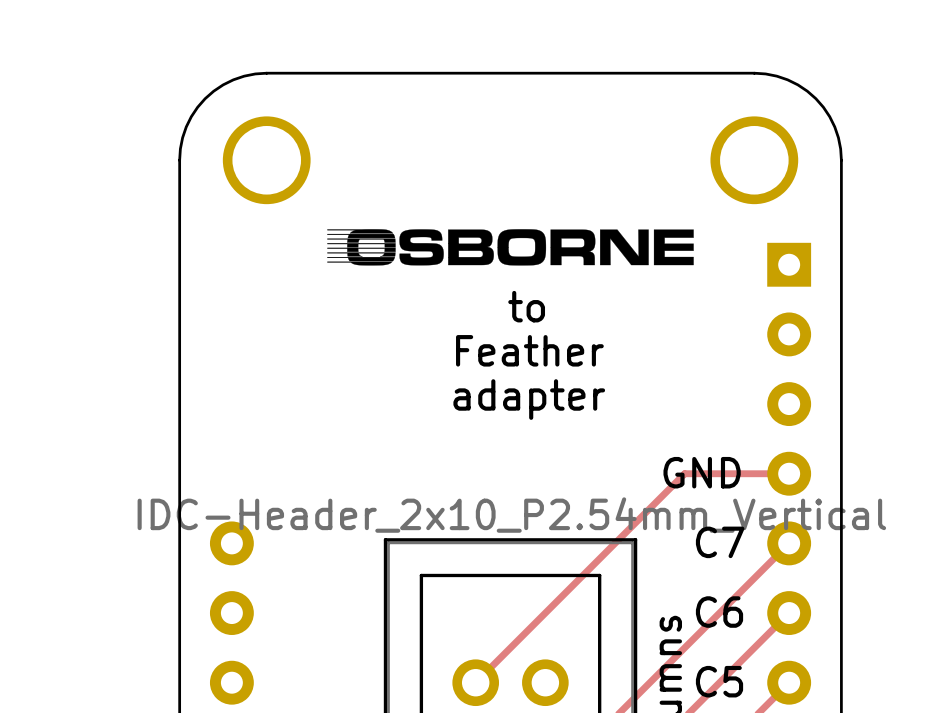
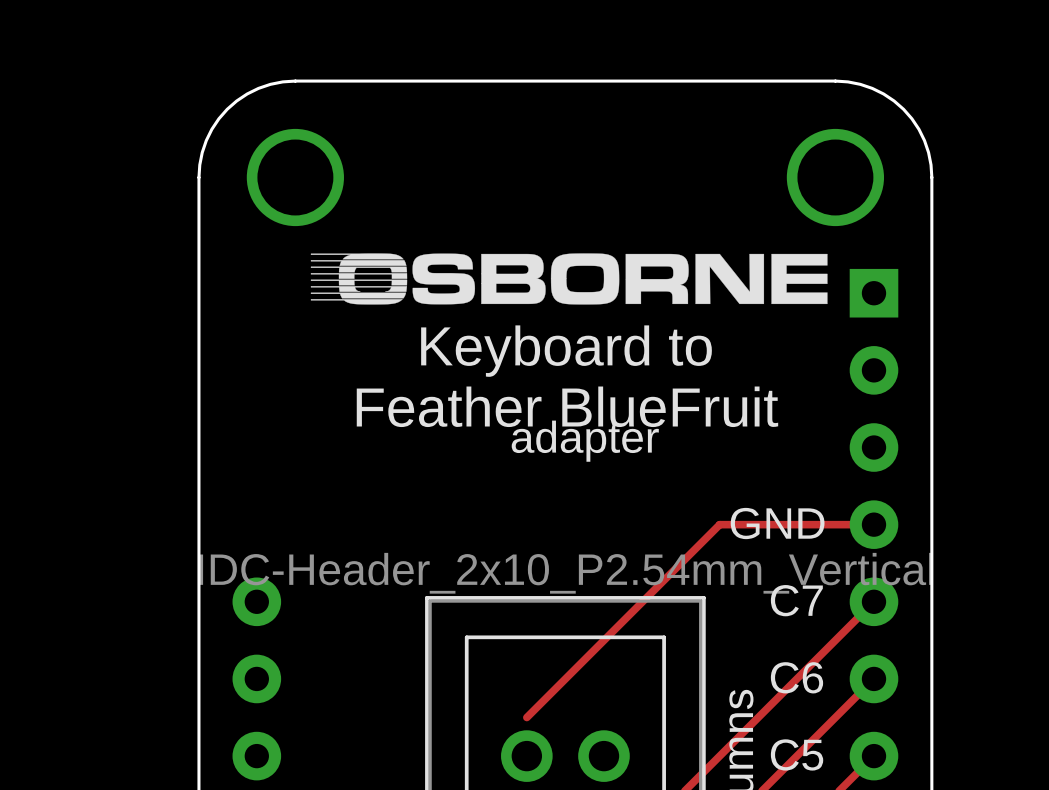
drawing: none -> [310, 253, 476, 305]
drawing: [327, 229, 444, 266] -> none
drawing shape: [448, 229, 494, 266] -> [481, 253, 546, 305]
drawing shape: [497, 229, 547, 266] -> [550, 253, 620, 305]
drawing: [550, 229, 649, 266] -> none
drawing: none -> [625, 253, 689, 305]
drawing shape: [653, 229, 694, 266] -> [695, 253, 765, 305]
drawing: none -> [771, 253, 828, 305]
text: to (526, 306) -> Keyboard to (566, 351)
text: Feather (529, 350) -> none
text: none -> Feather BlueFruit (567, 406)
top track: (684, 473) (475, 682) -> (758, 524) (719, 524) (526, 717)

